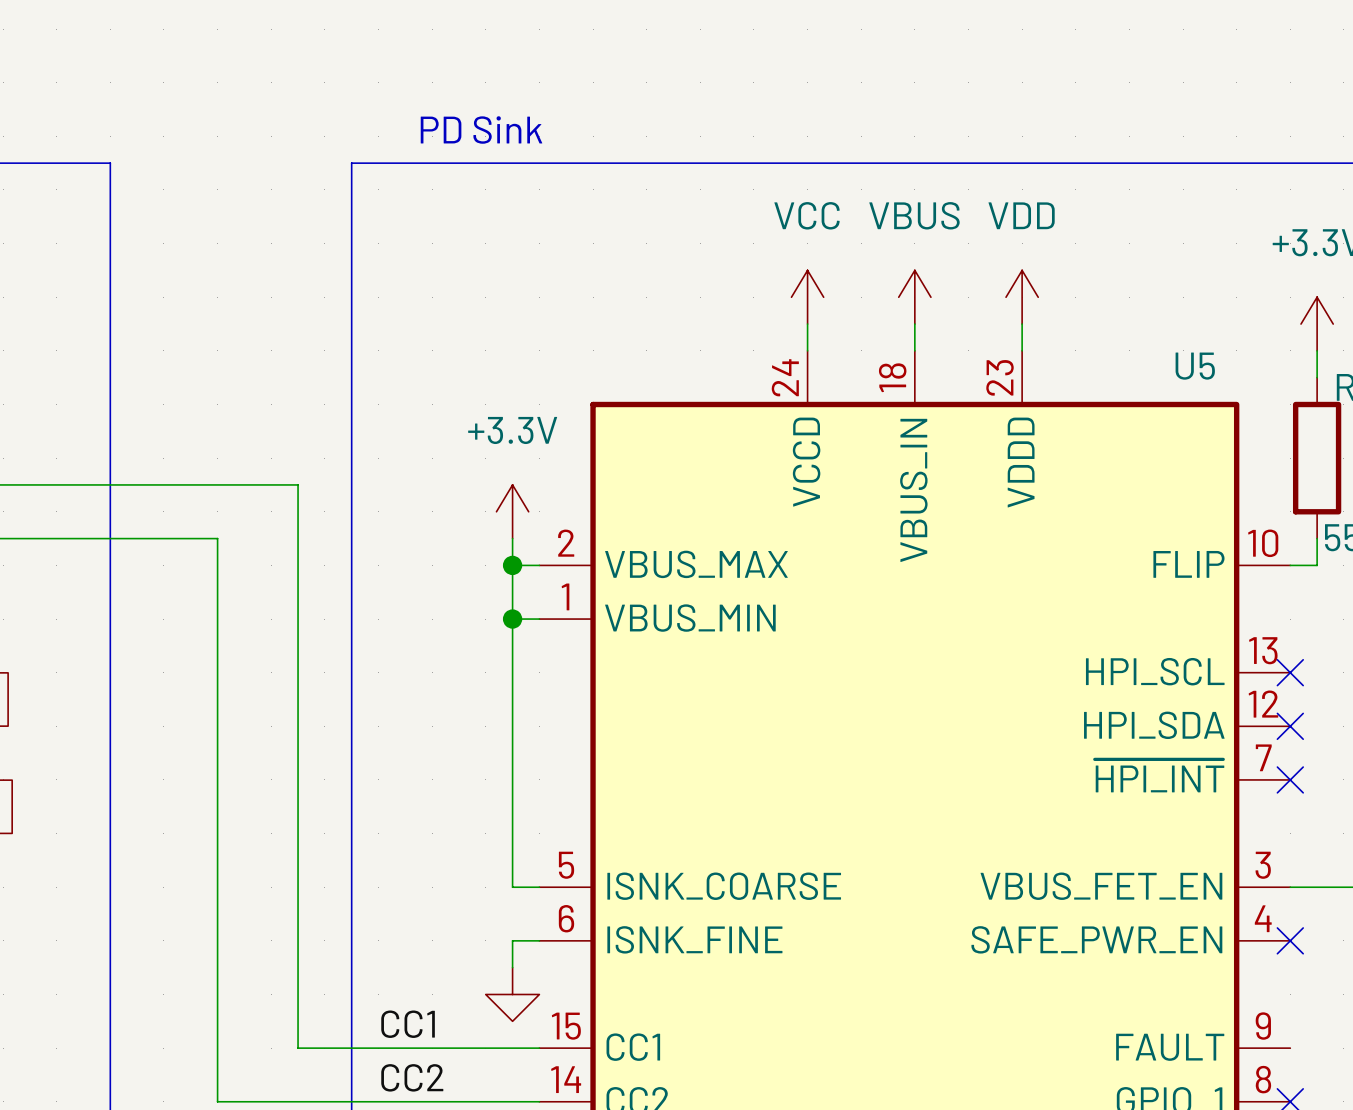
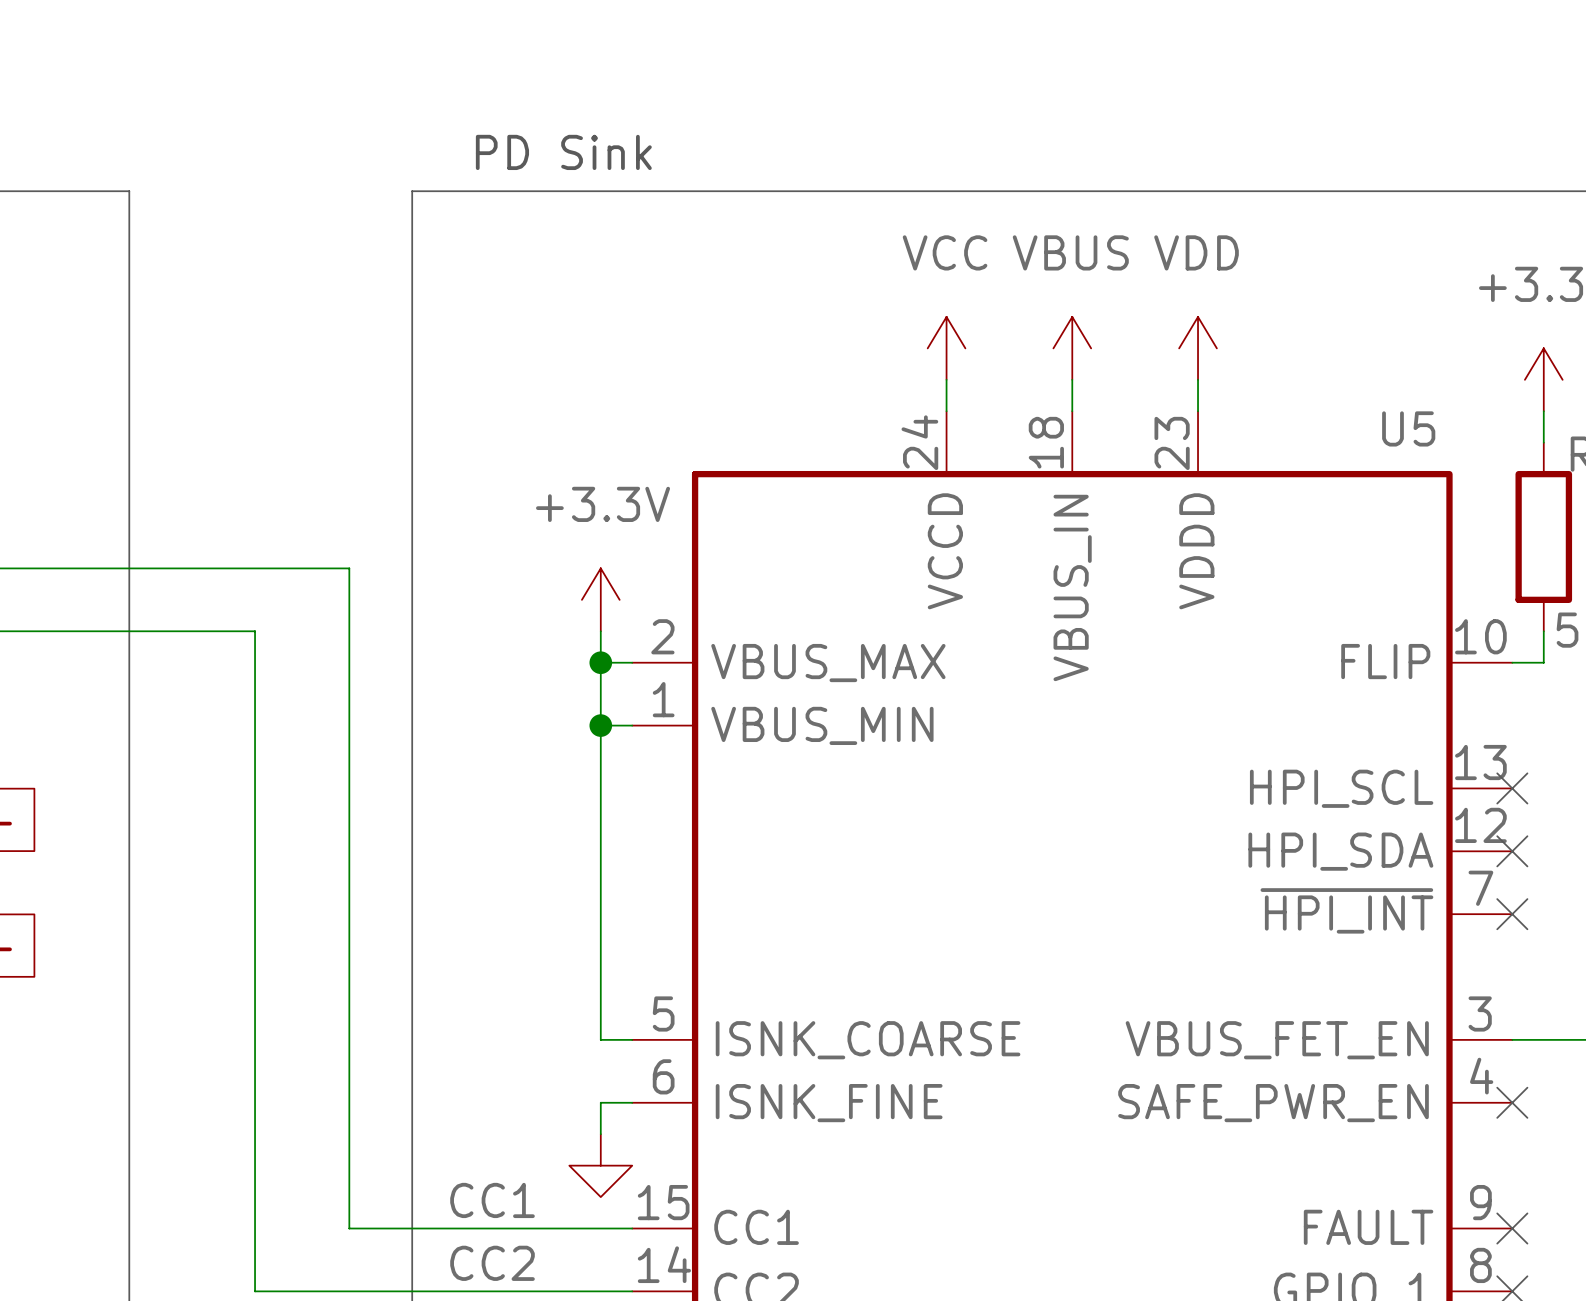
no-connect mark: none -> (1512, 1228)

